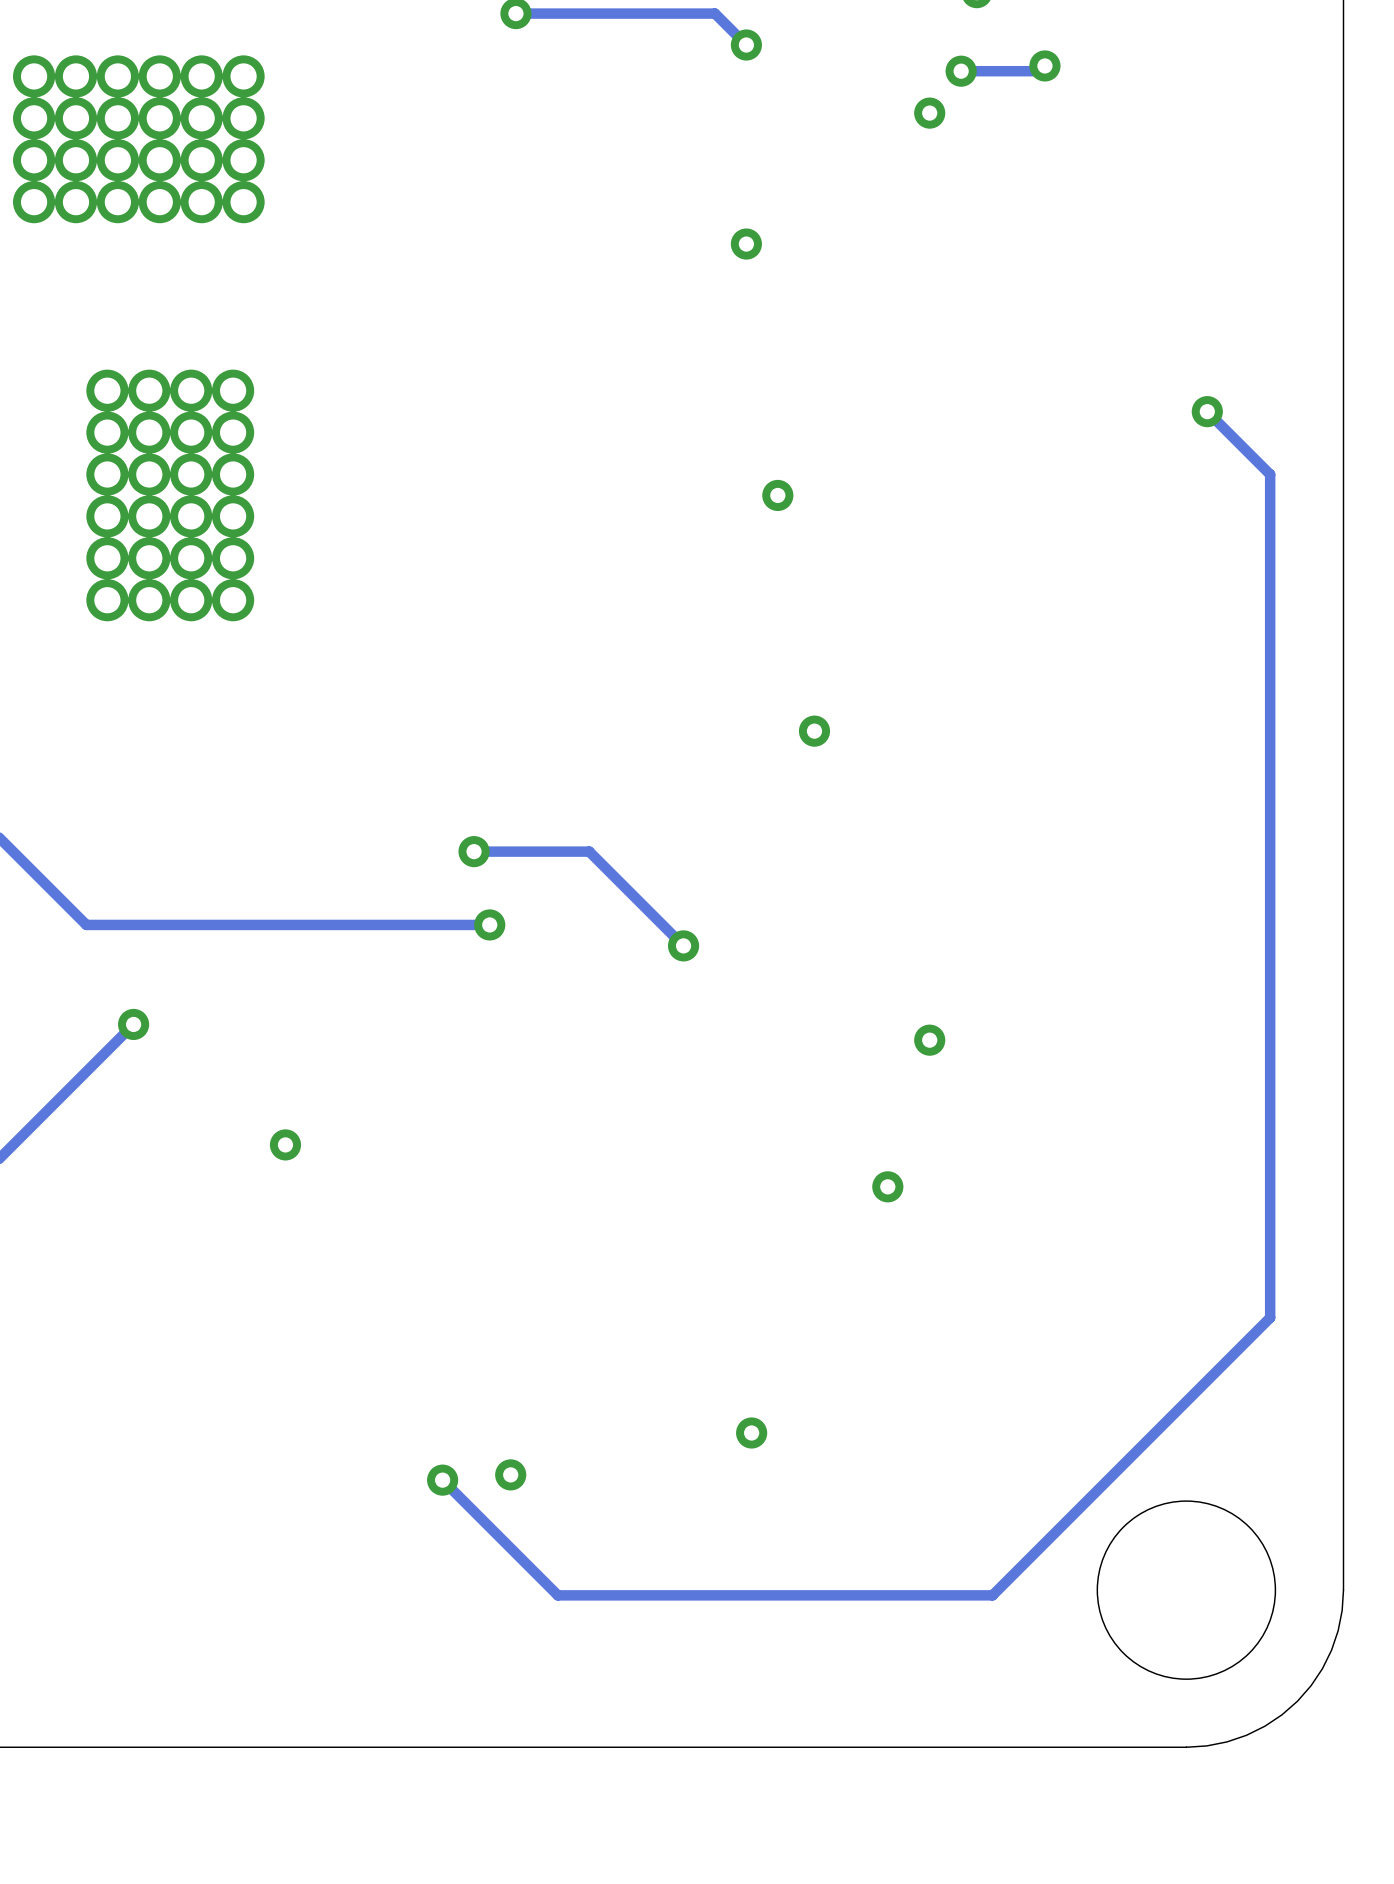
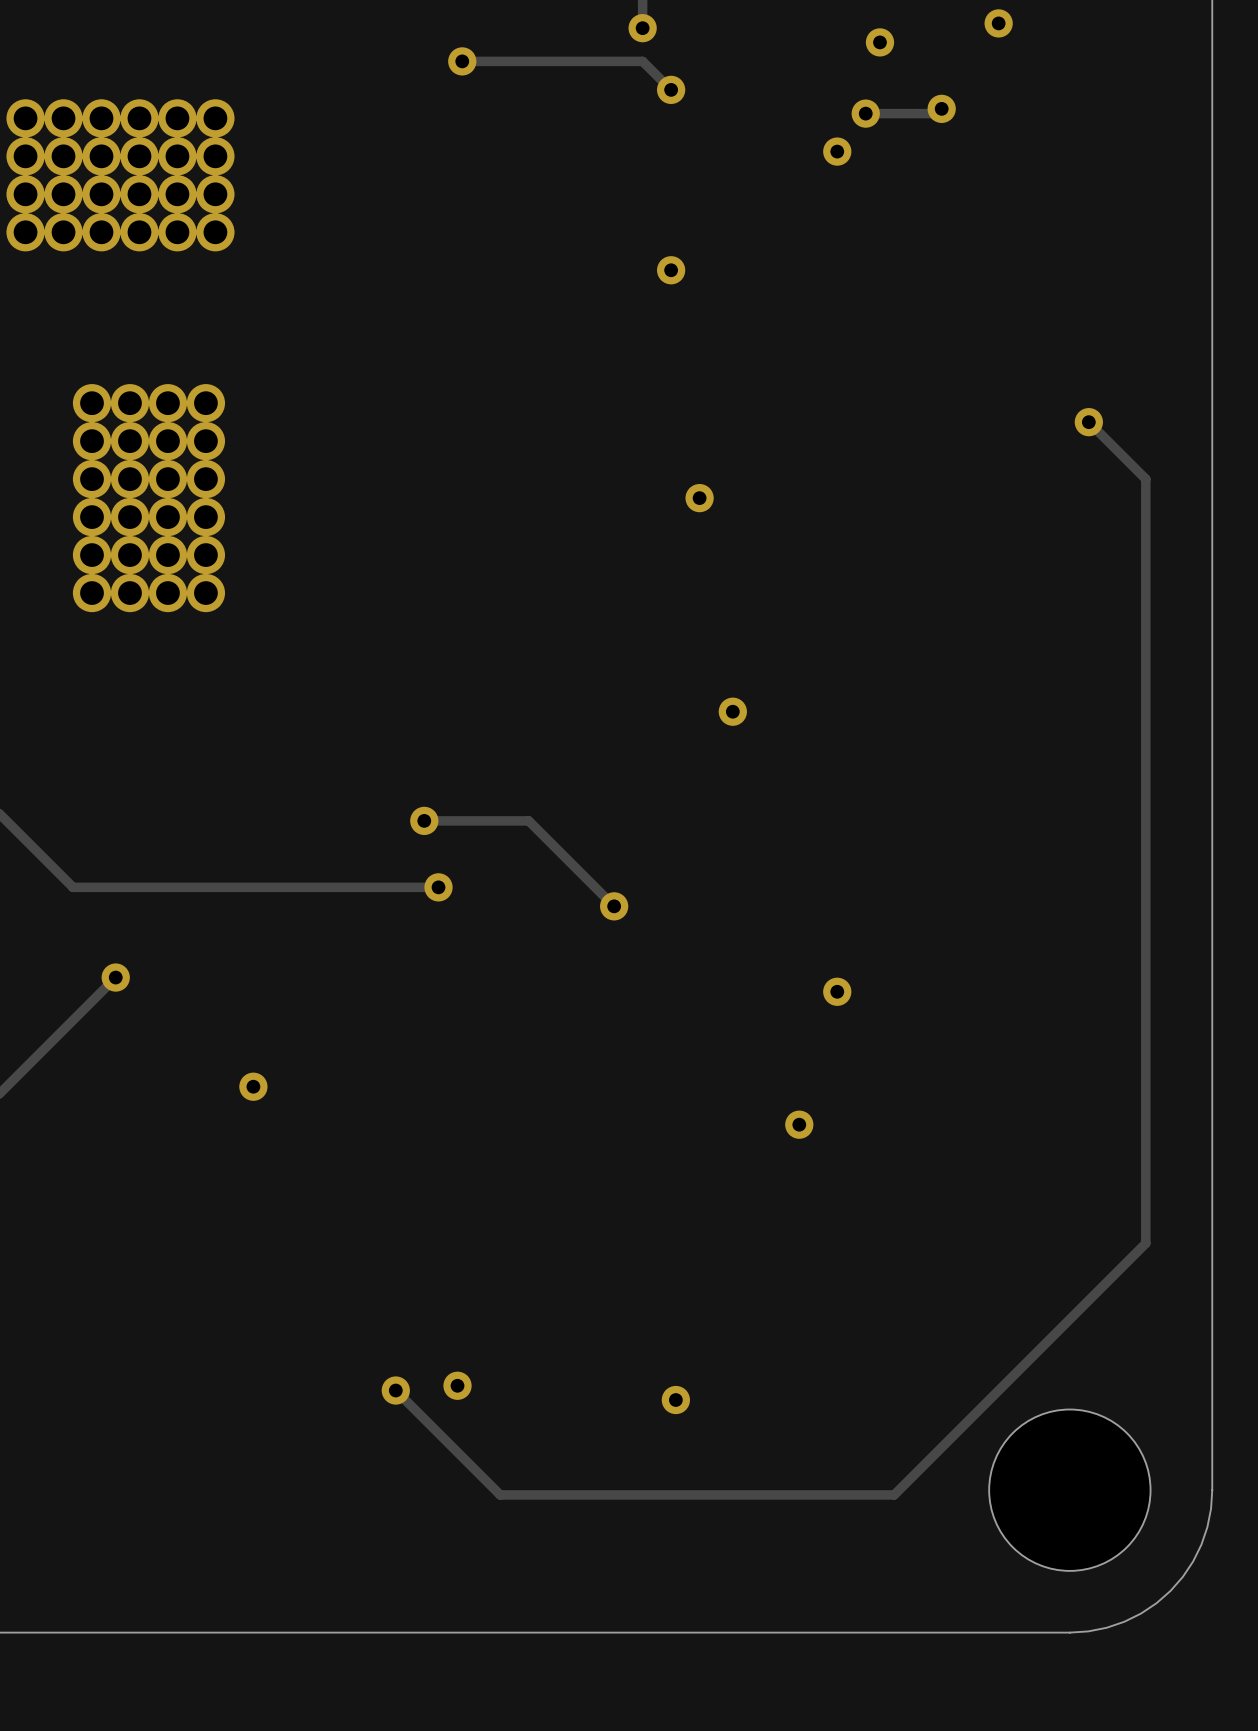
via position: (751, 1432) -> (675, 1400)

